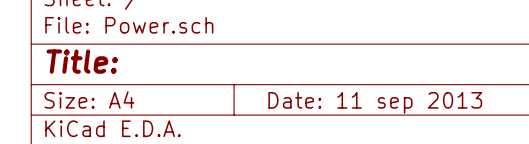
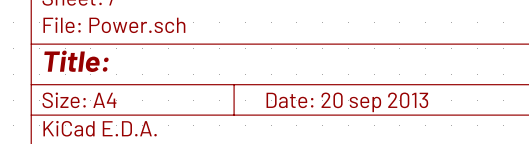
title block: Date: 11 sep 2013 (375, 102) -> Date: 20 sep 2013 (347, 102)

